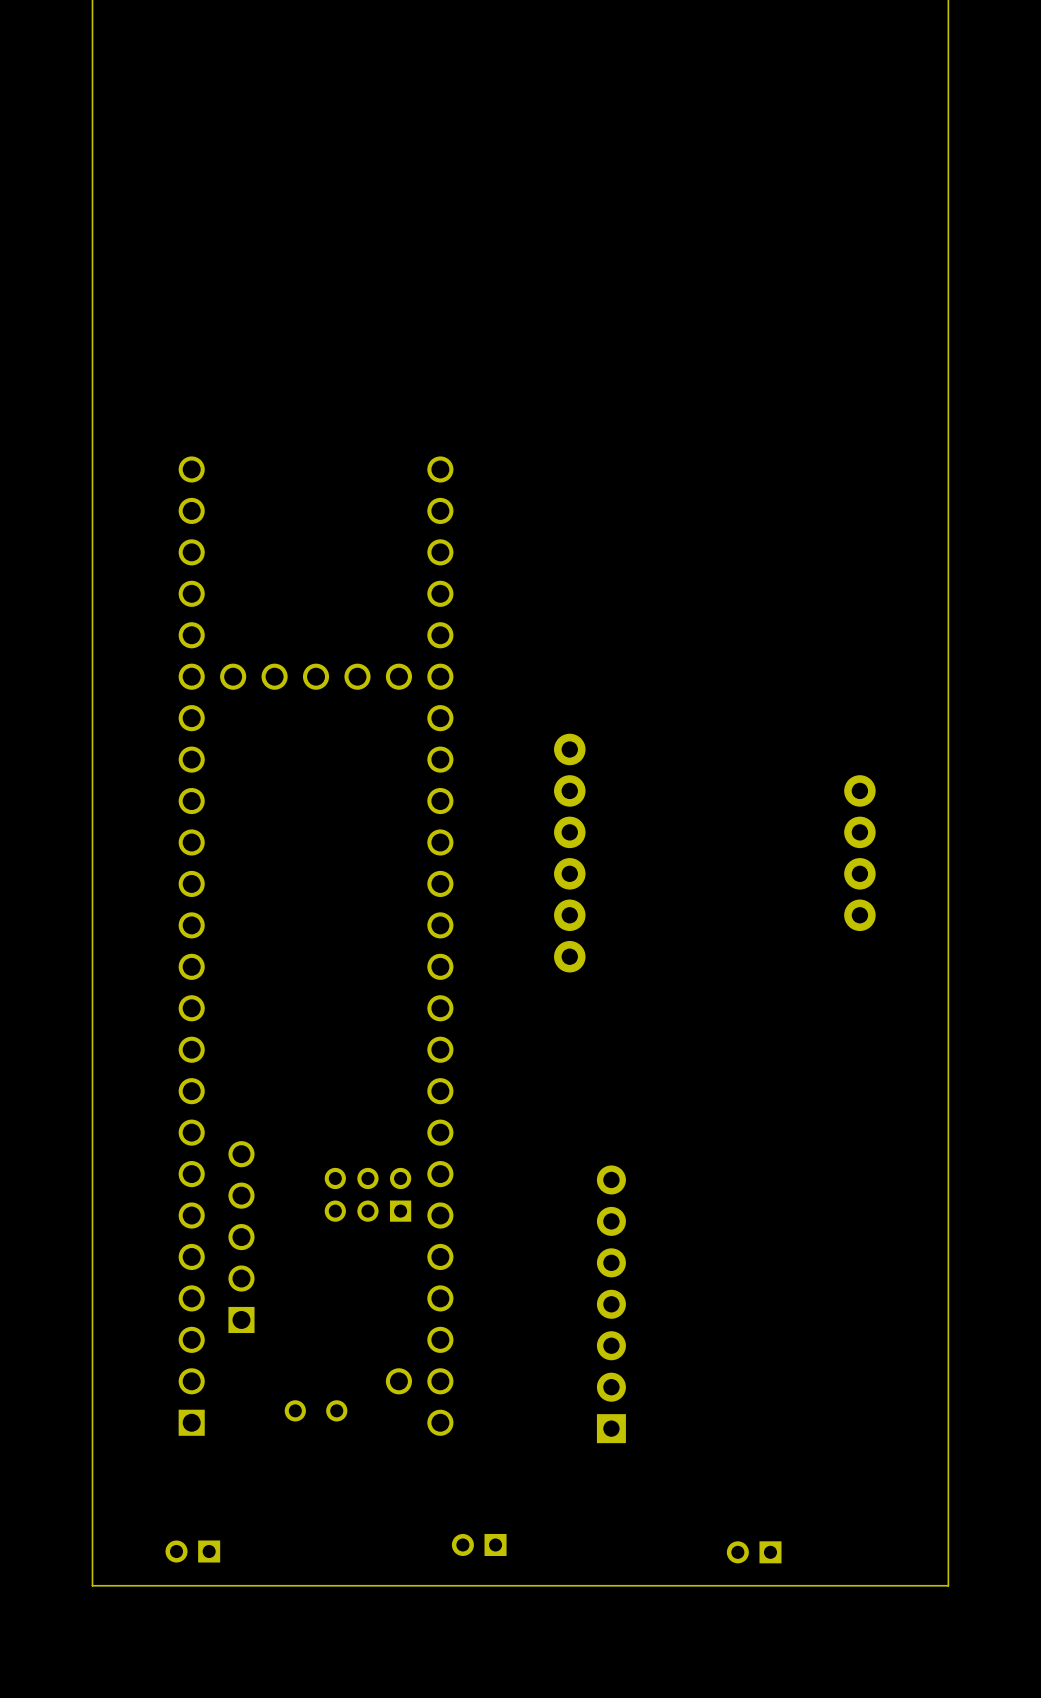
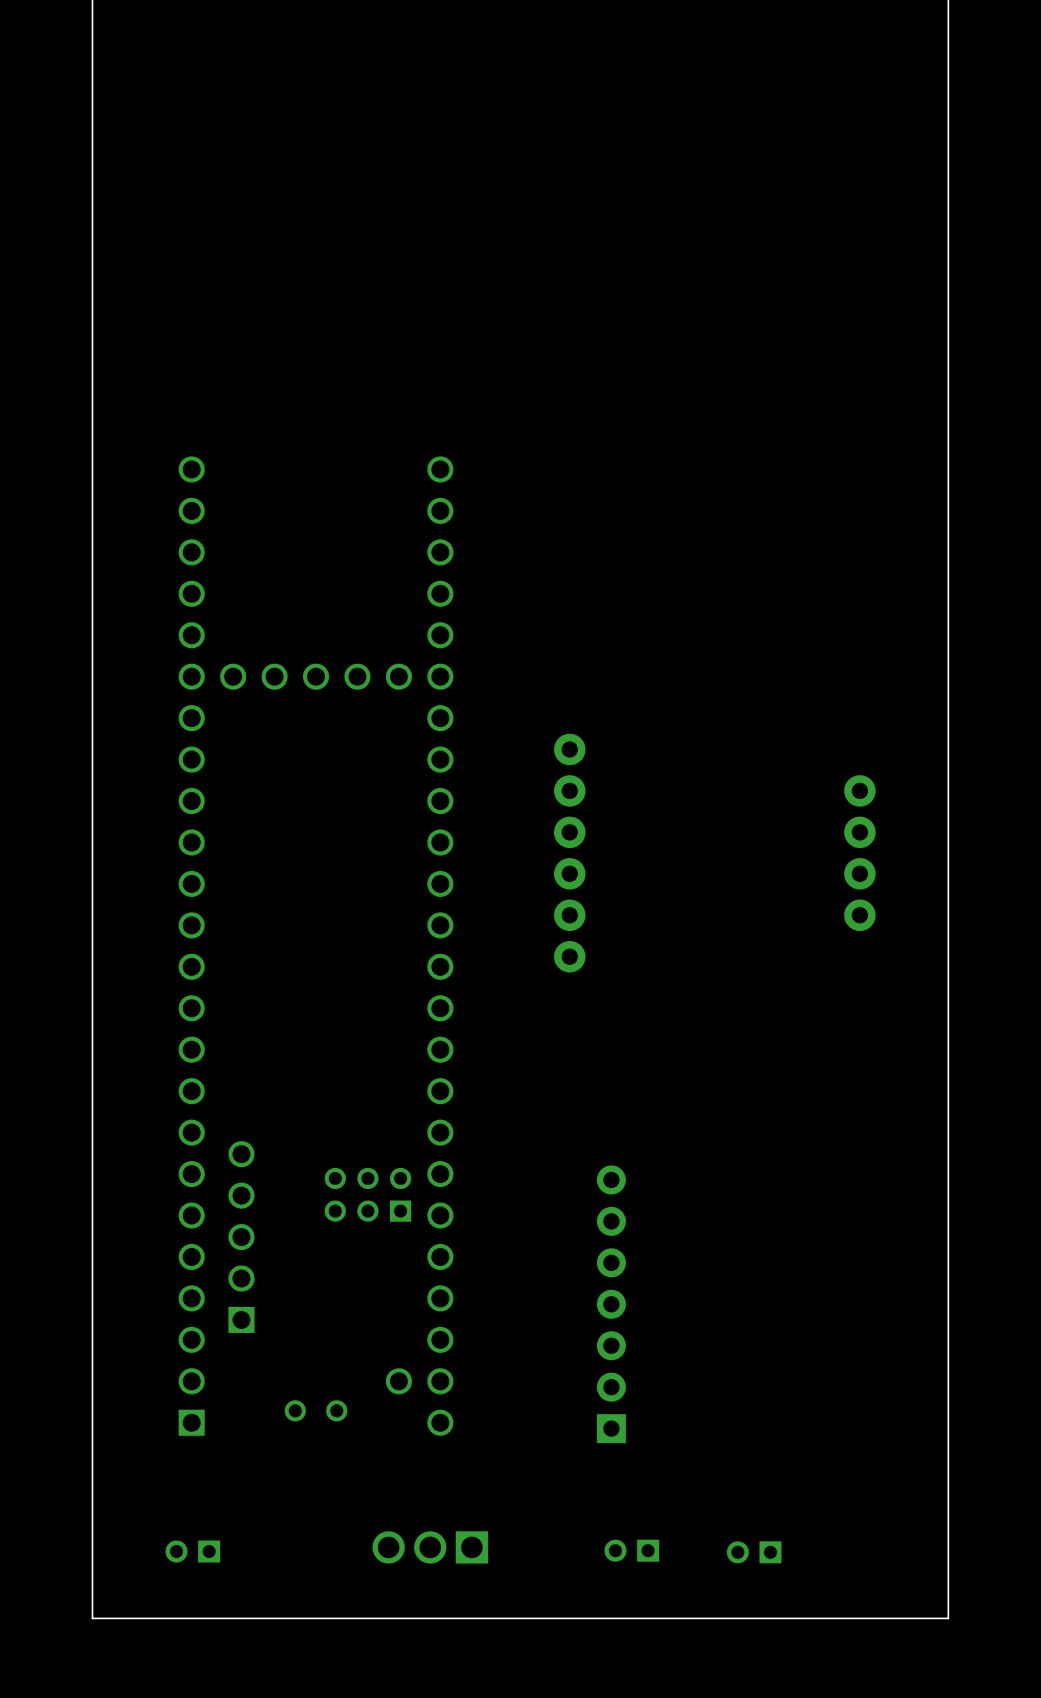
part position: (479, 1544) -> (631, 1550)
part: none -> (430, 1547)
board edge: (948, 1585) (92, 1585) -> (948, 1585) (948, 1618) (92, 1618) (92, 1585)

